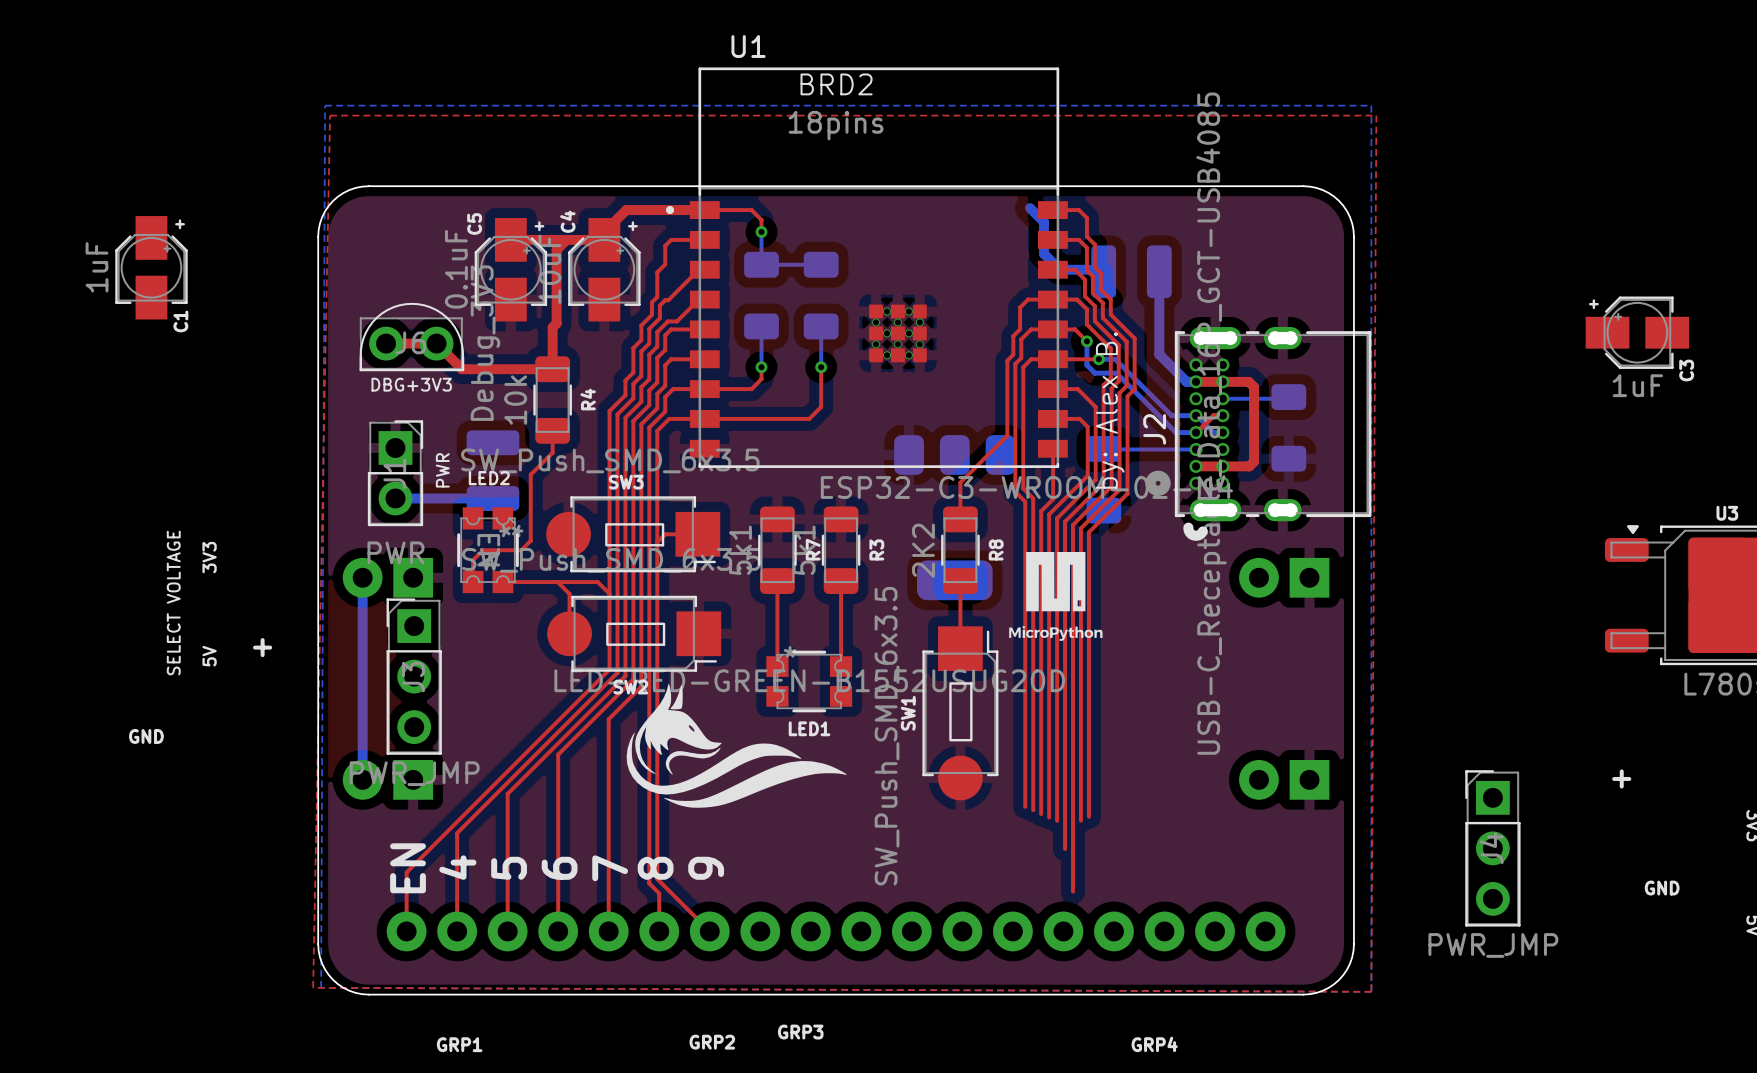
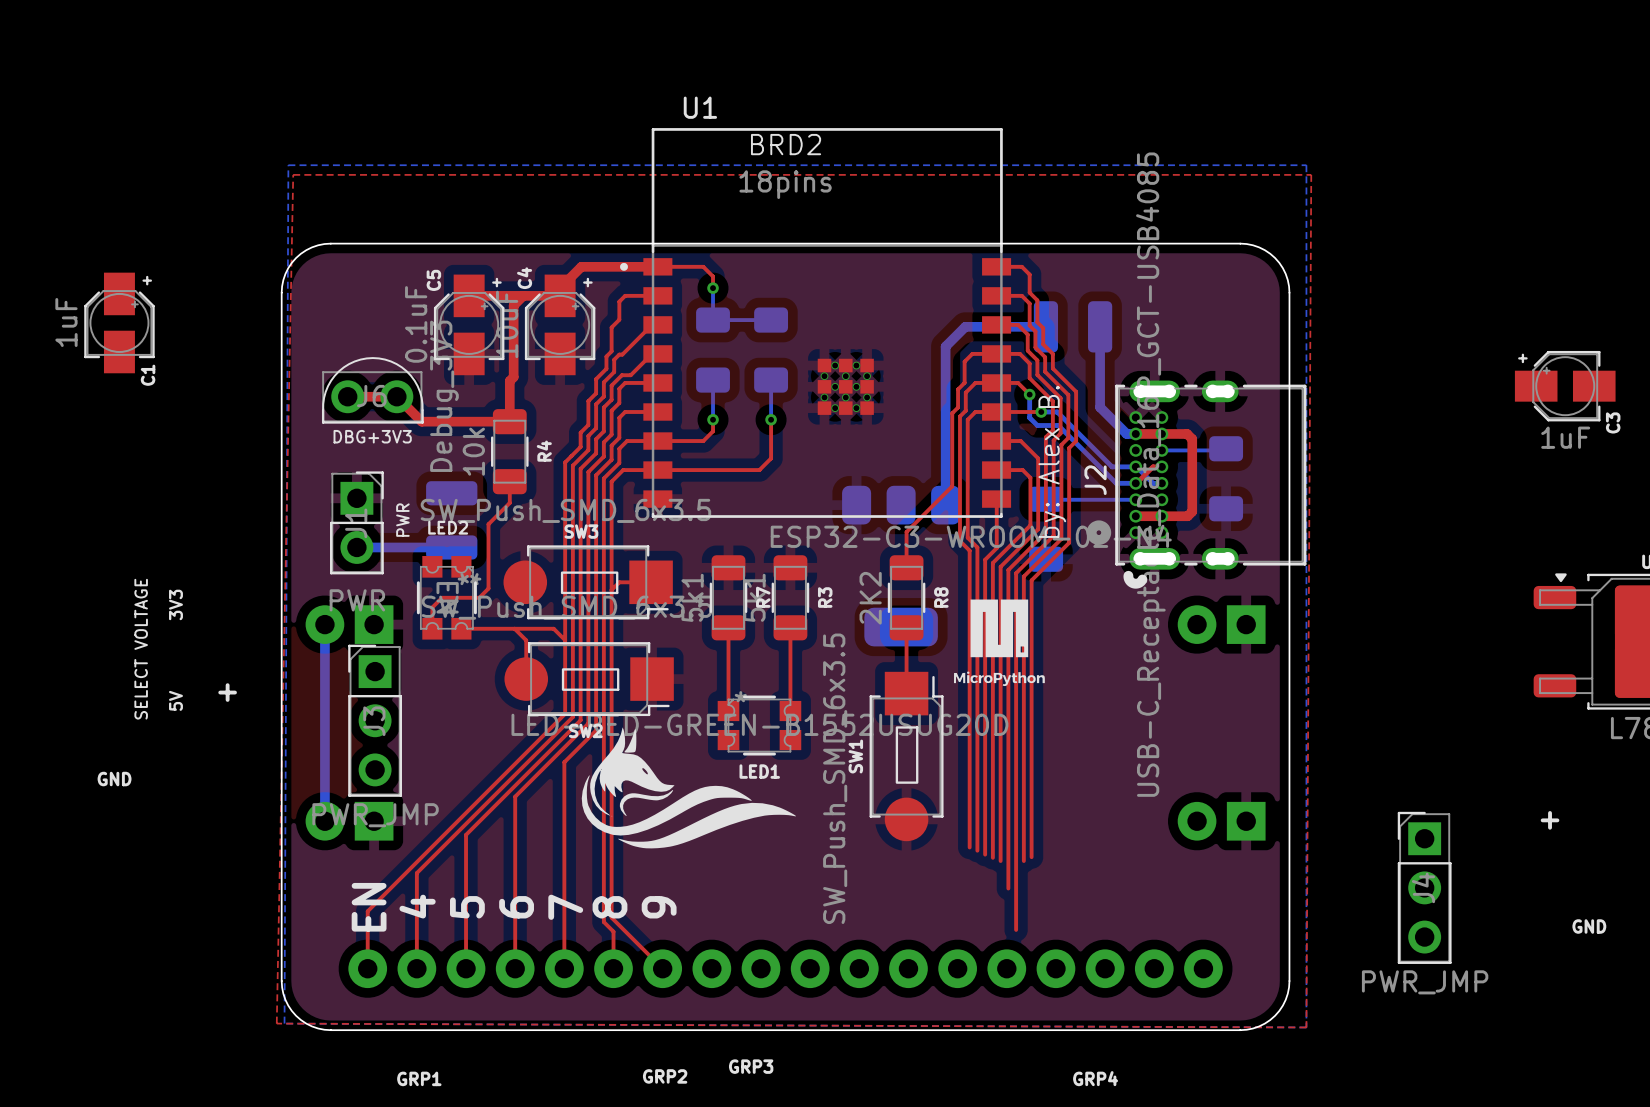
bottom track: (1030, 208) (1043, 222) (1043, 253) (1059, 269) (1103, 269) -> none
bottom track: none -> (1045, 326) (965, 326) (945, 346) (945, 505)

